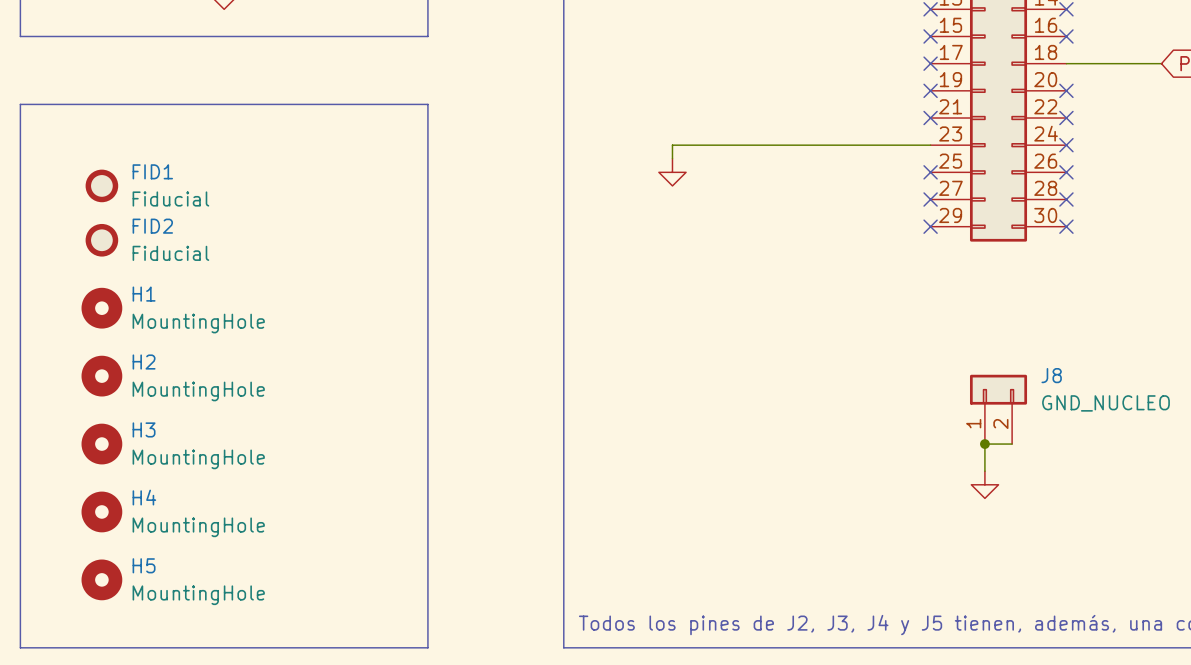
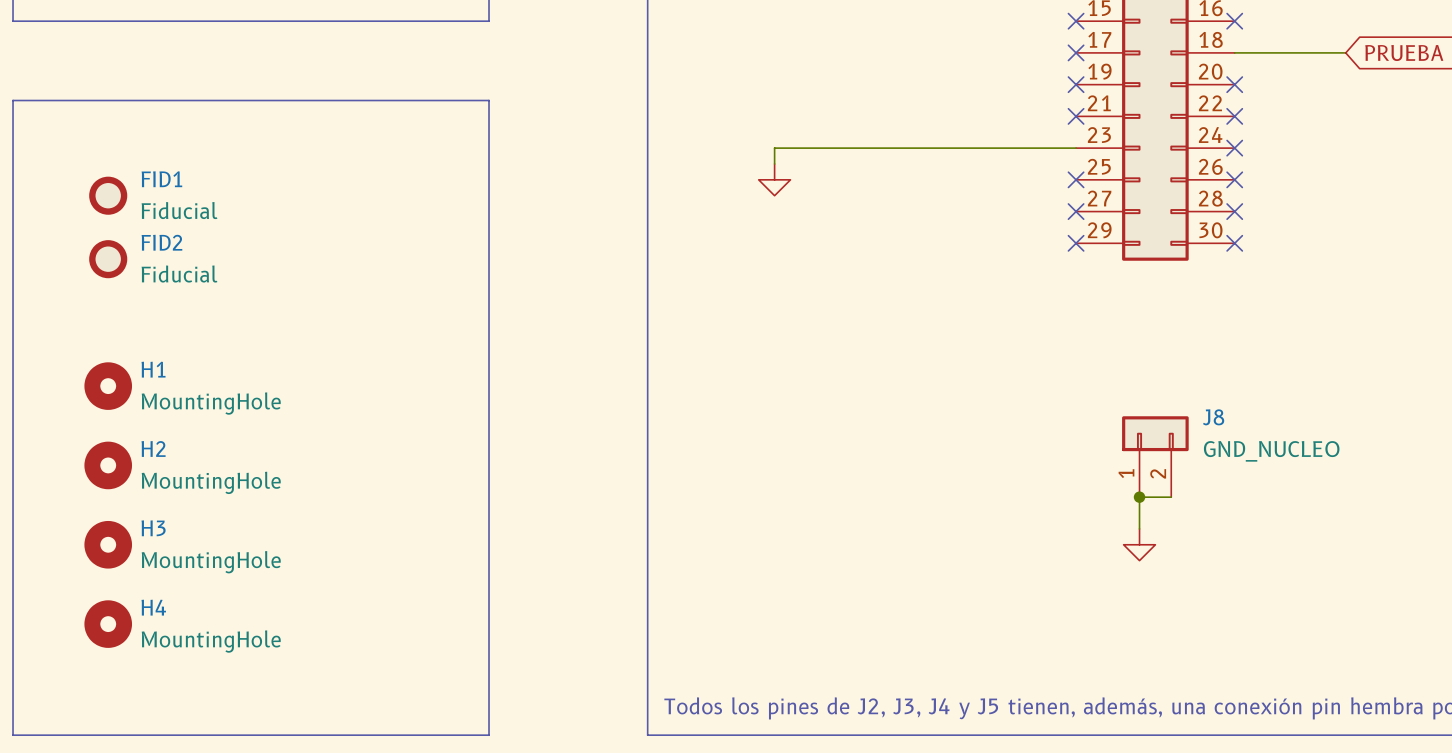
H1 position: (101, 308) -> (108, 386)
H2 position: (101, 376) -> (108, 465)
H3 position: (101, 444) -> (108, 544)
H4 position: (101, 511) -> (108, 624)
H5: MountingHole (101, 579) -> none

